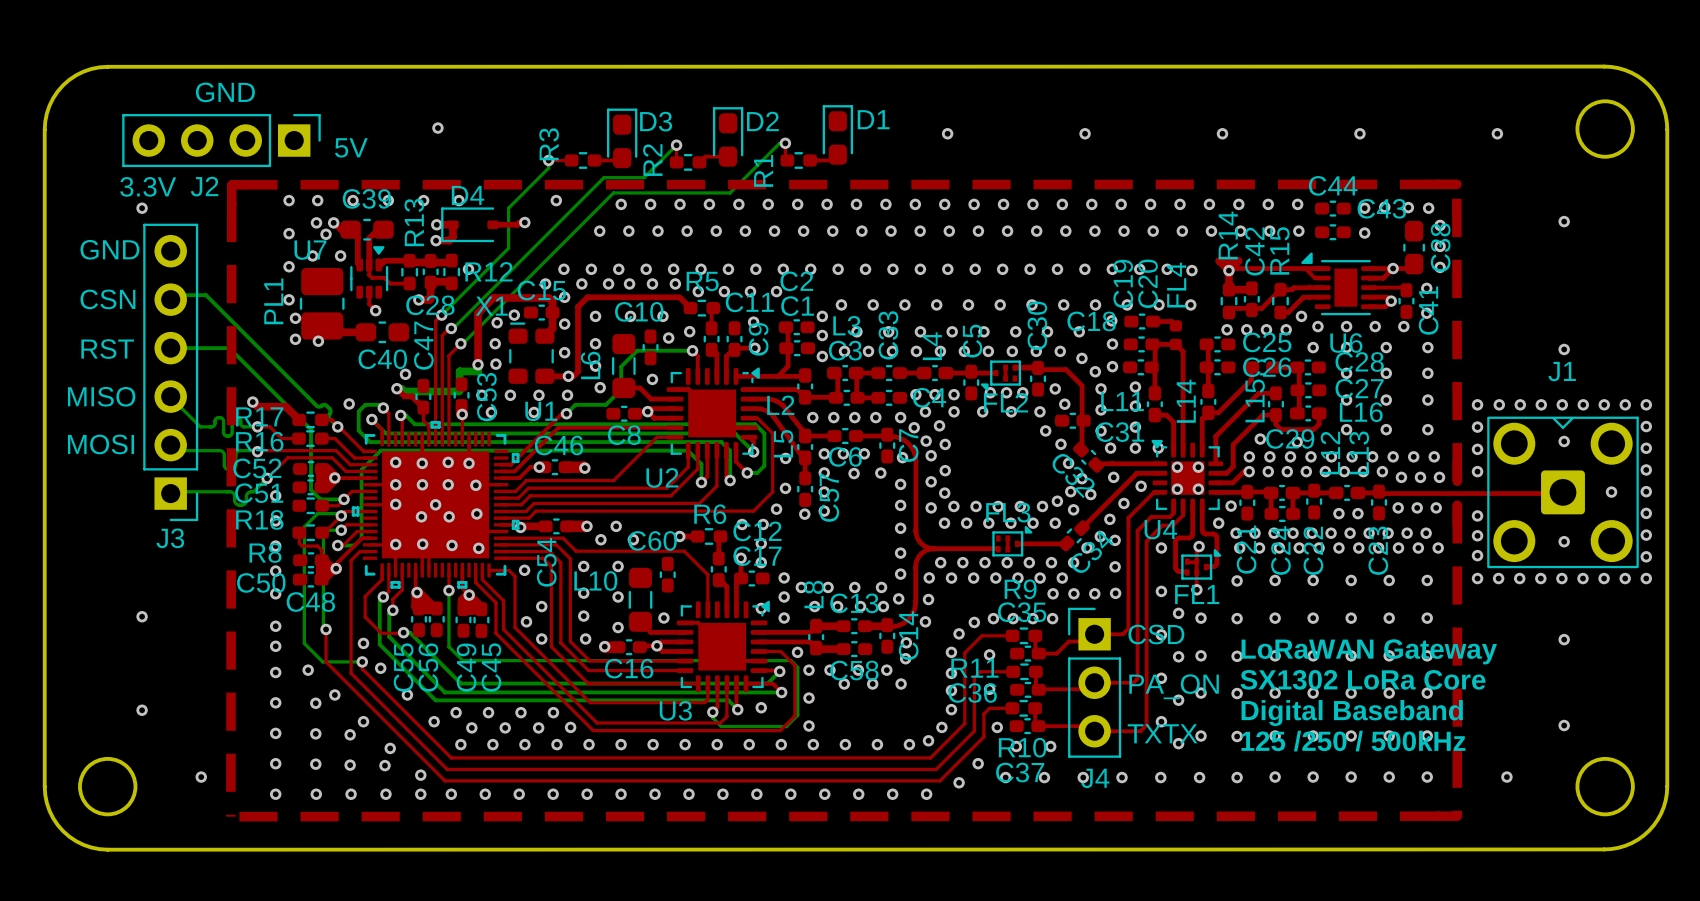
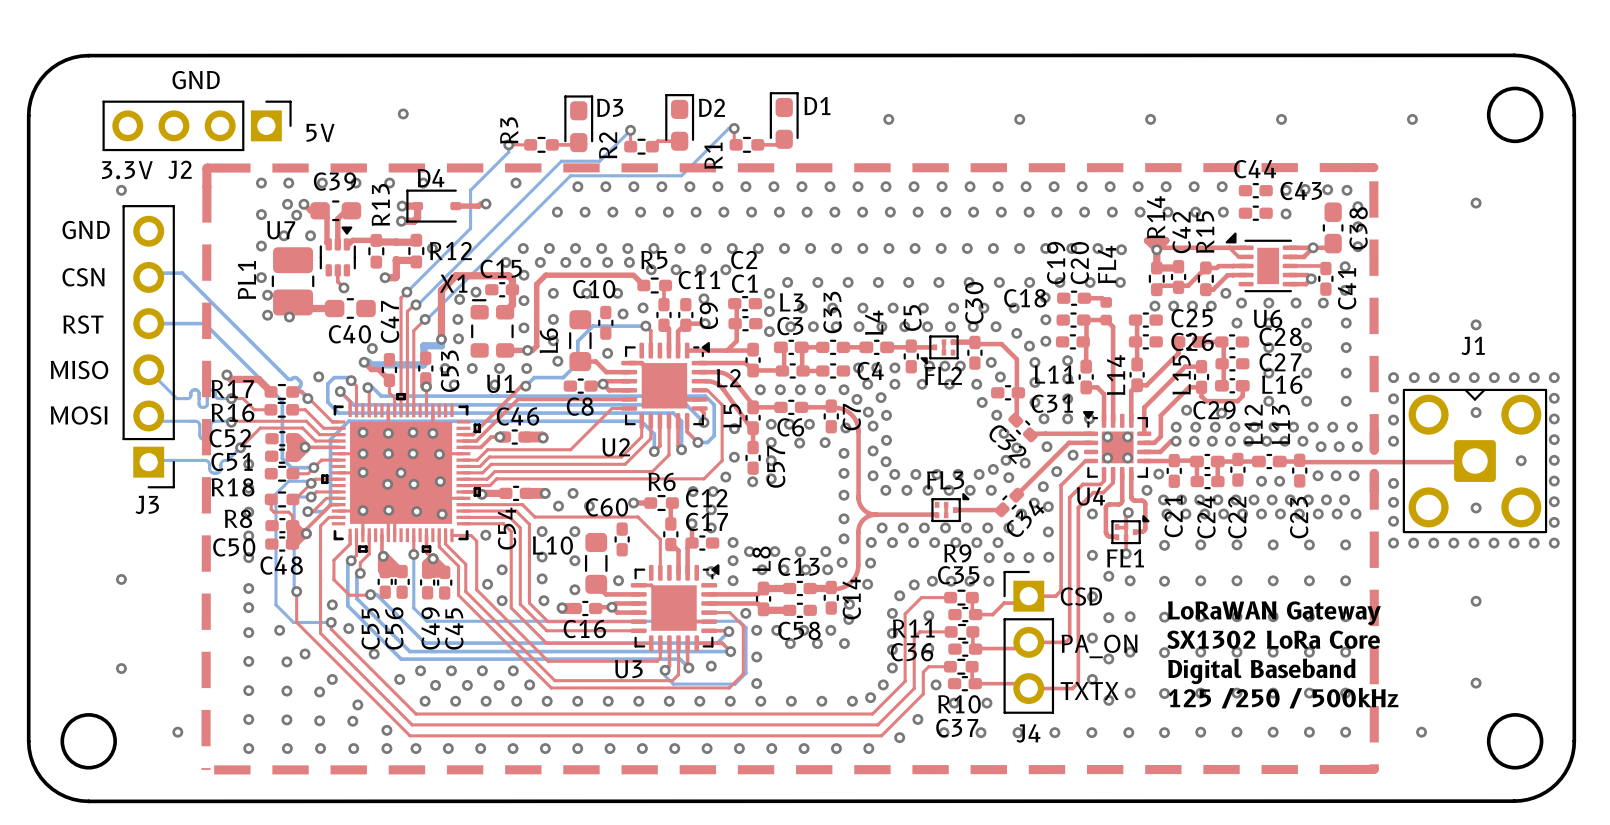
top track: (369, 265) (369, 275) (372, 277) (384, 277) (390, 283) (409, 283) -> none
C28: (430, 271) -> none

